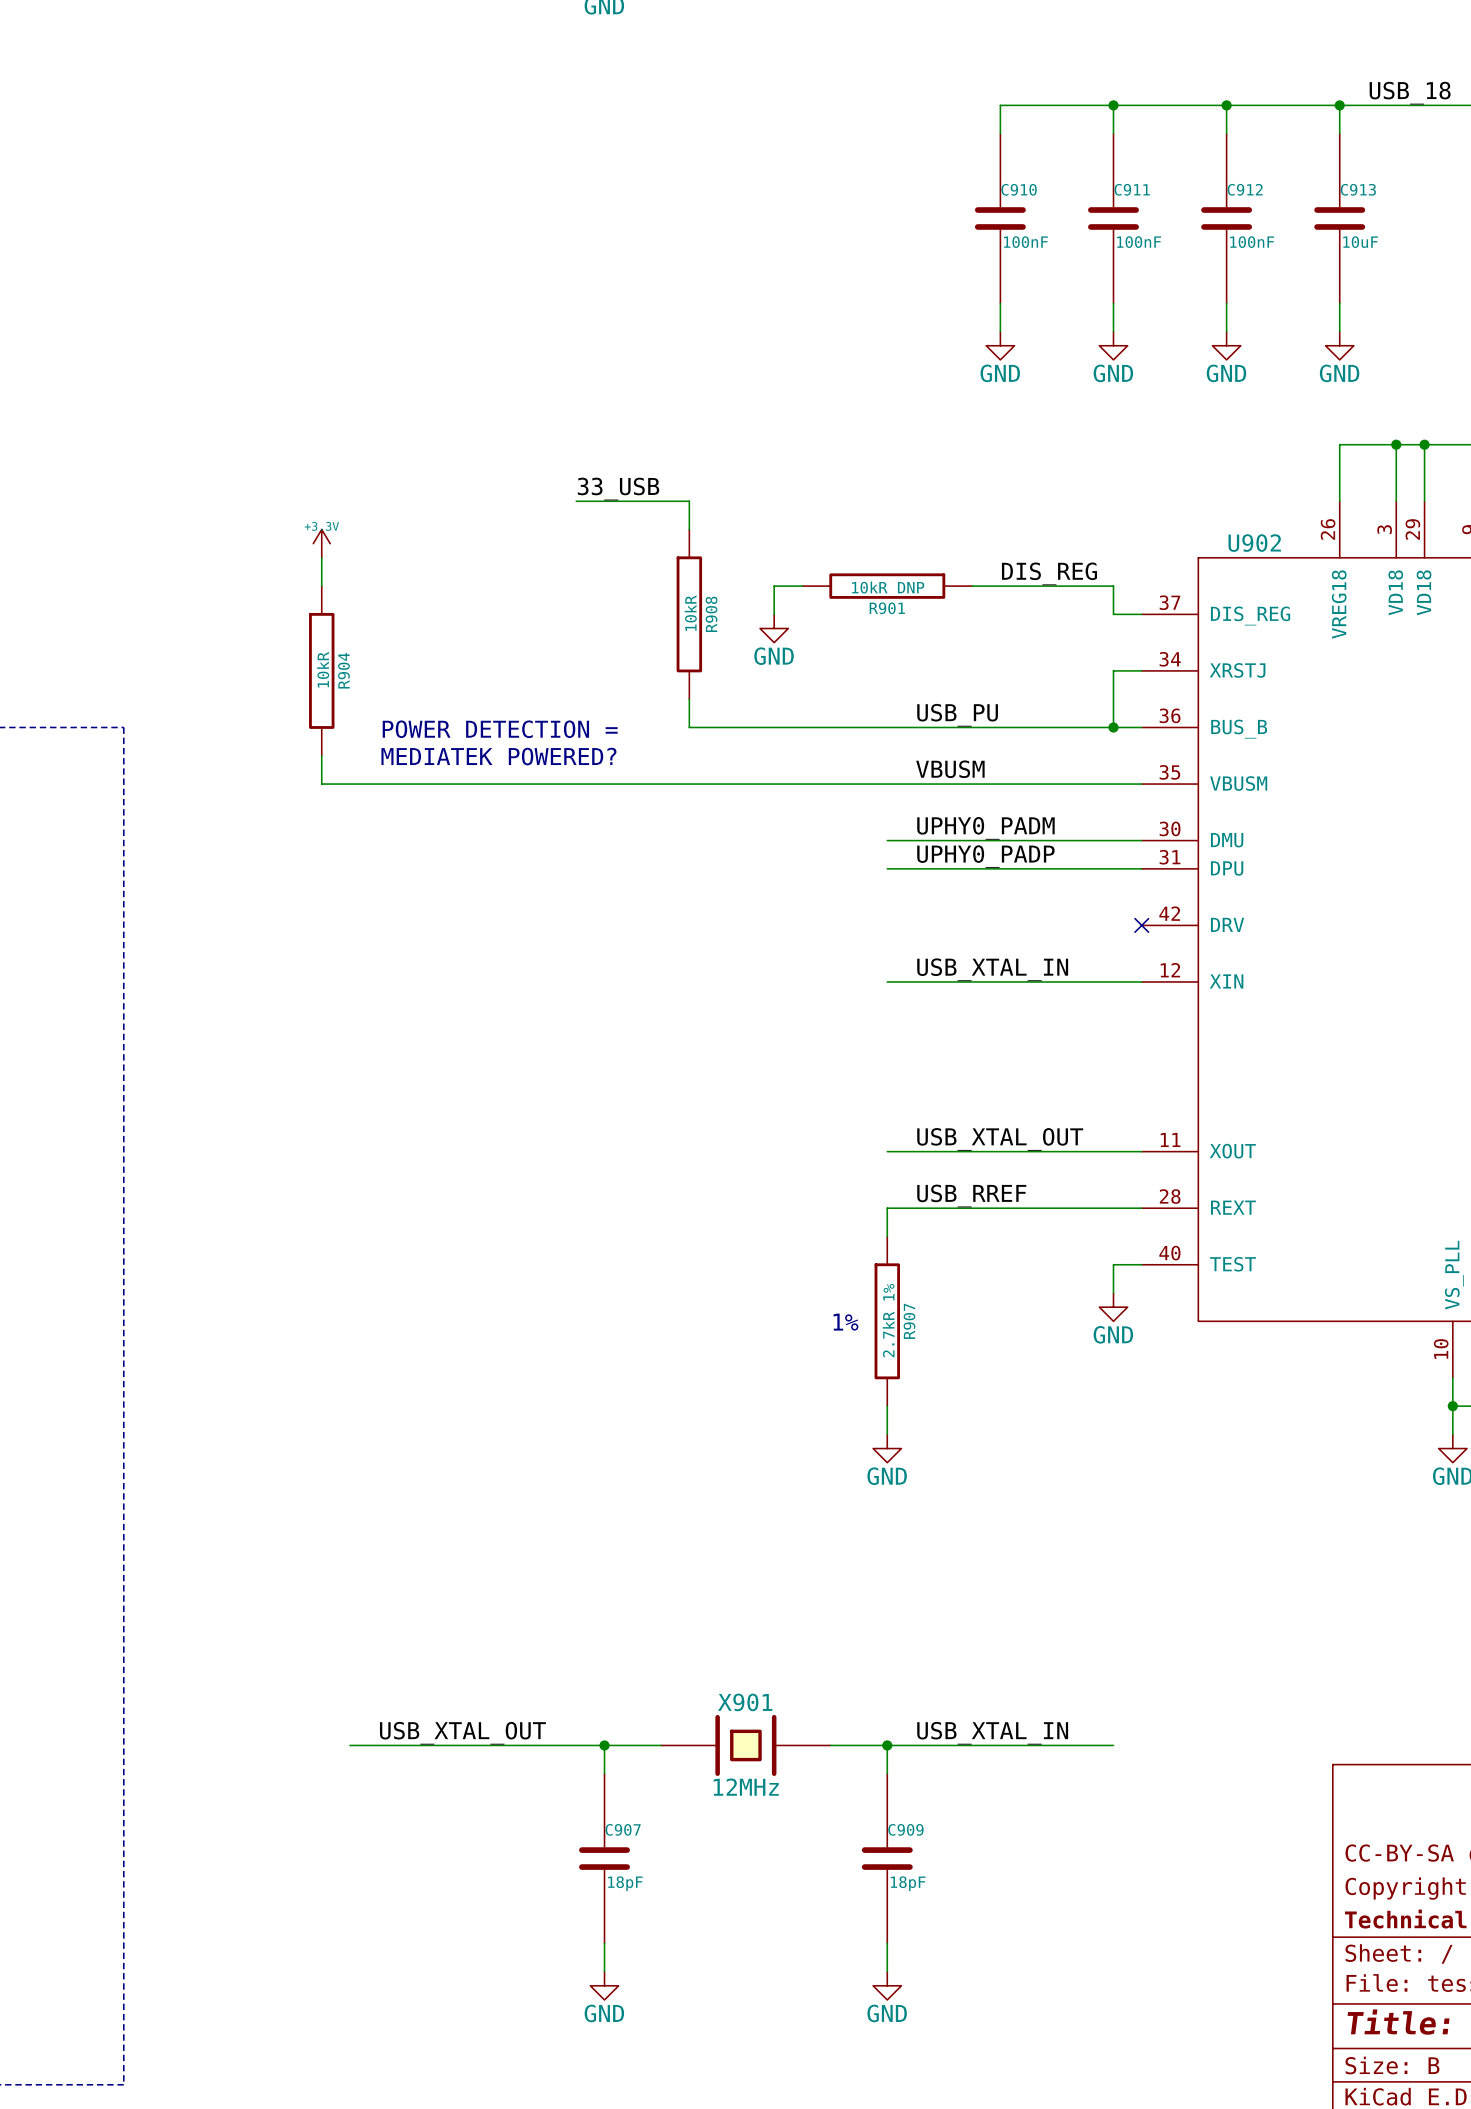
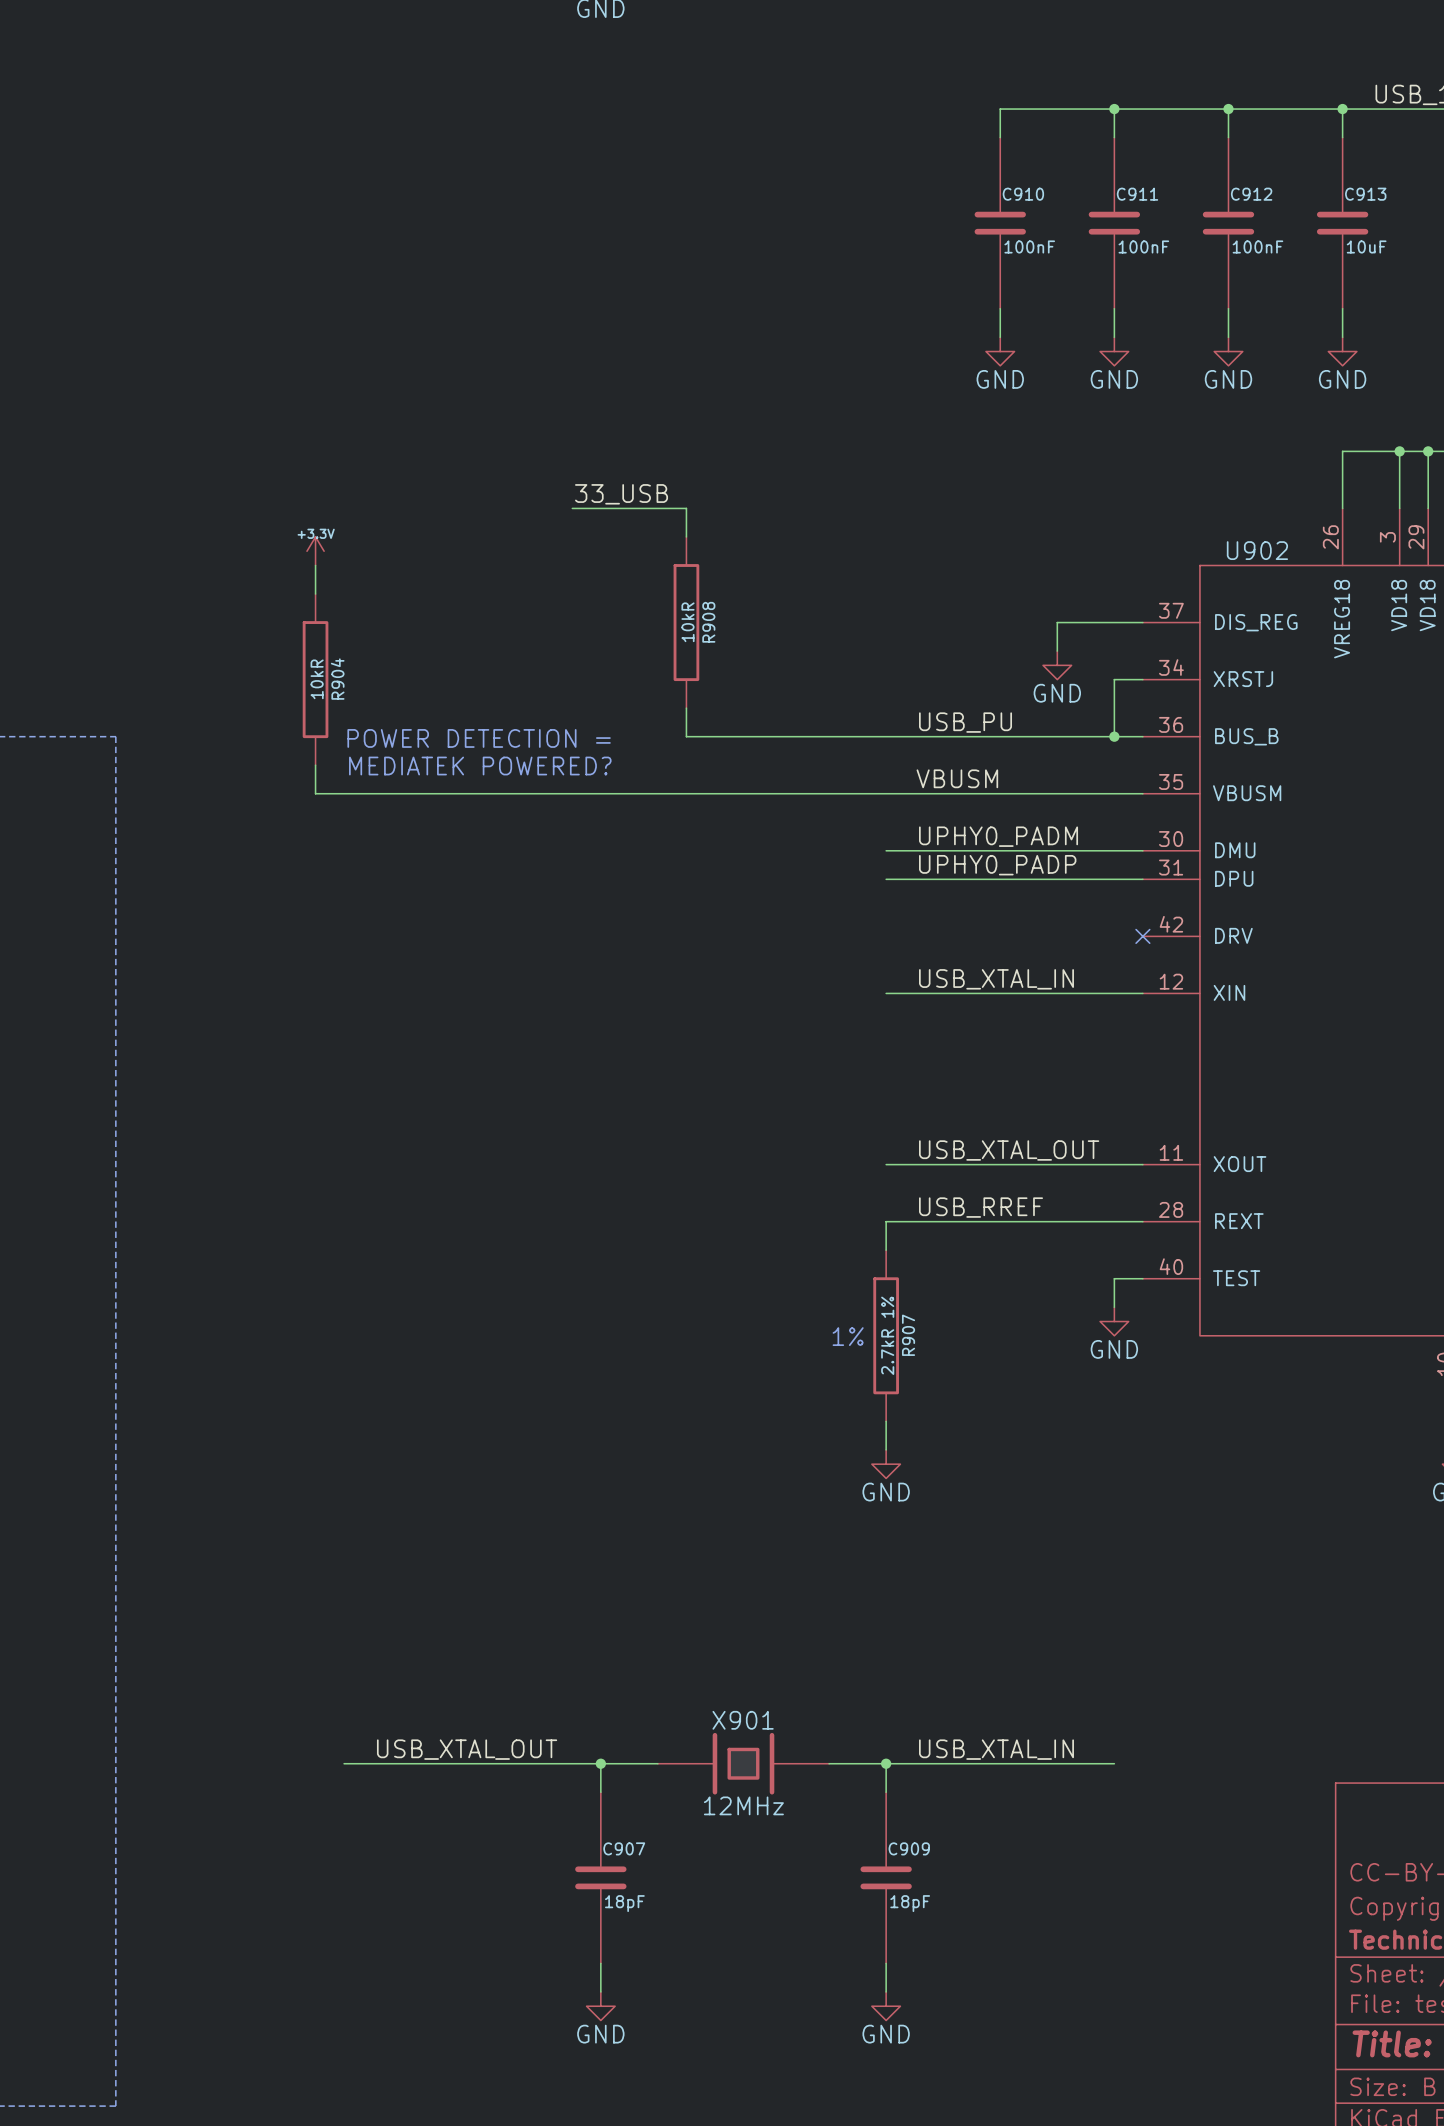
label: DIS_REG (1049, 573) -> none
wire: (802, 586) (774, 586) (774, 614) -> none
R901: 10kR DNP (887, 586) -> none
wire: (972, 586) (1113, 586) (1113, 614) -> (1057, 651) (1057, 622) (1114, 622)
power symbol: GND (774, 628) -> none
power symbol: none -> GND (1057, 665)

